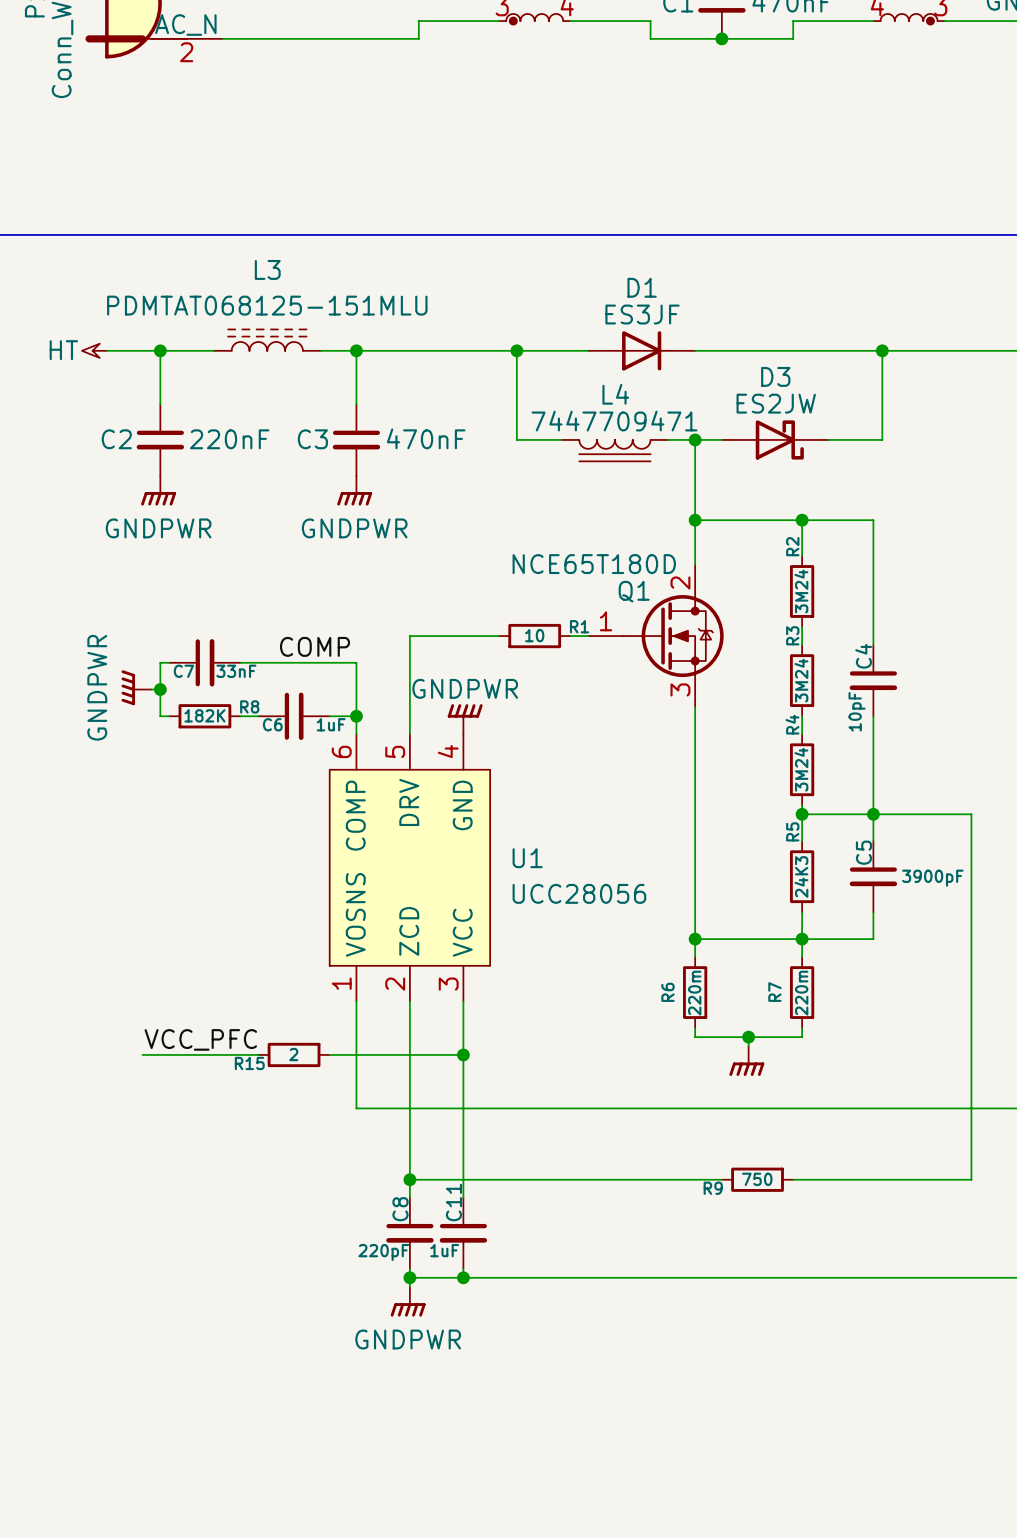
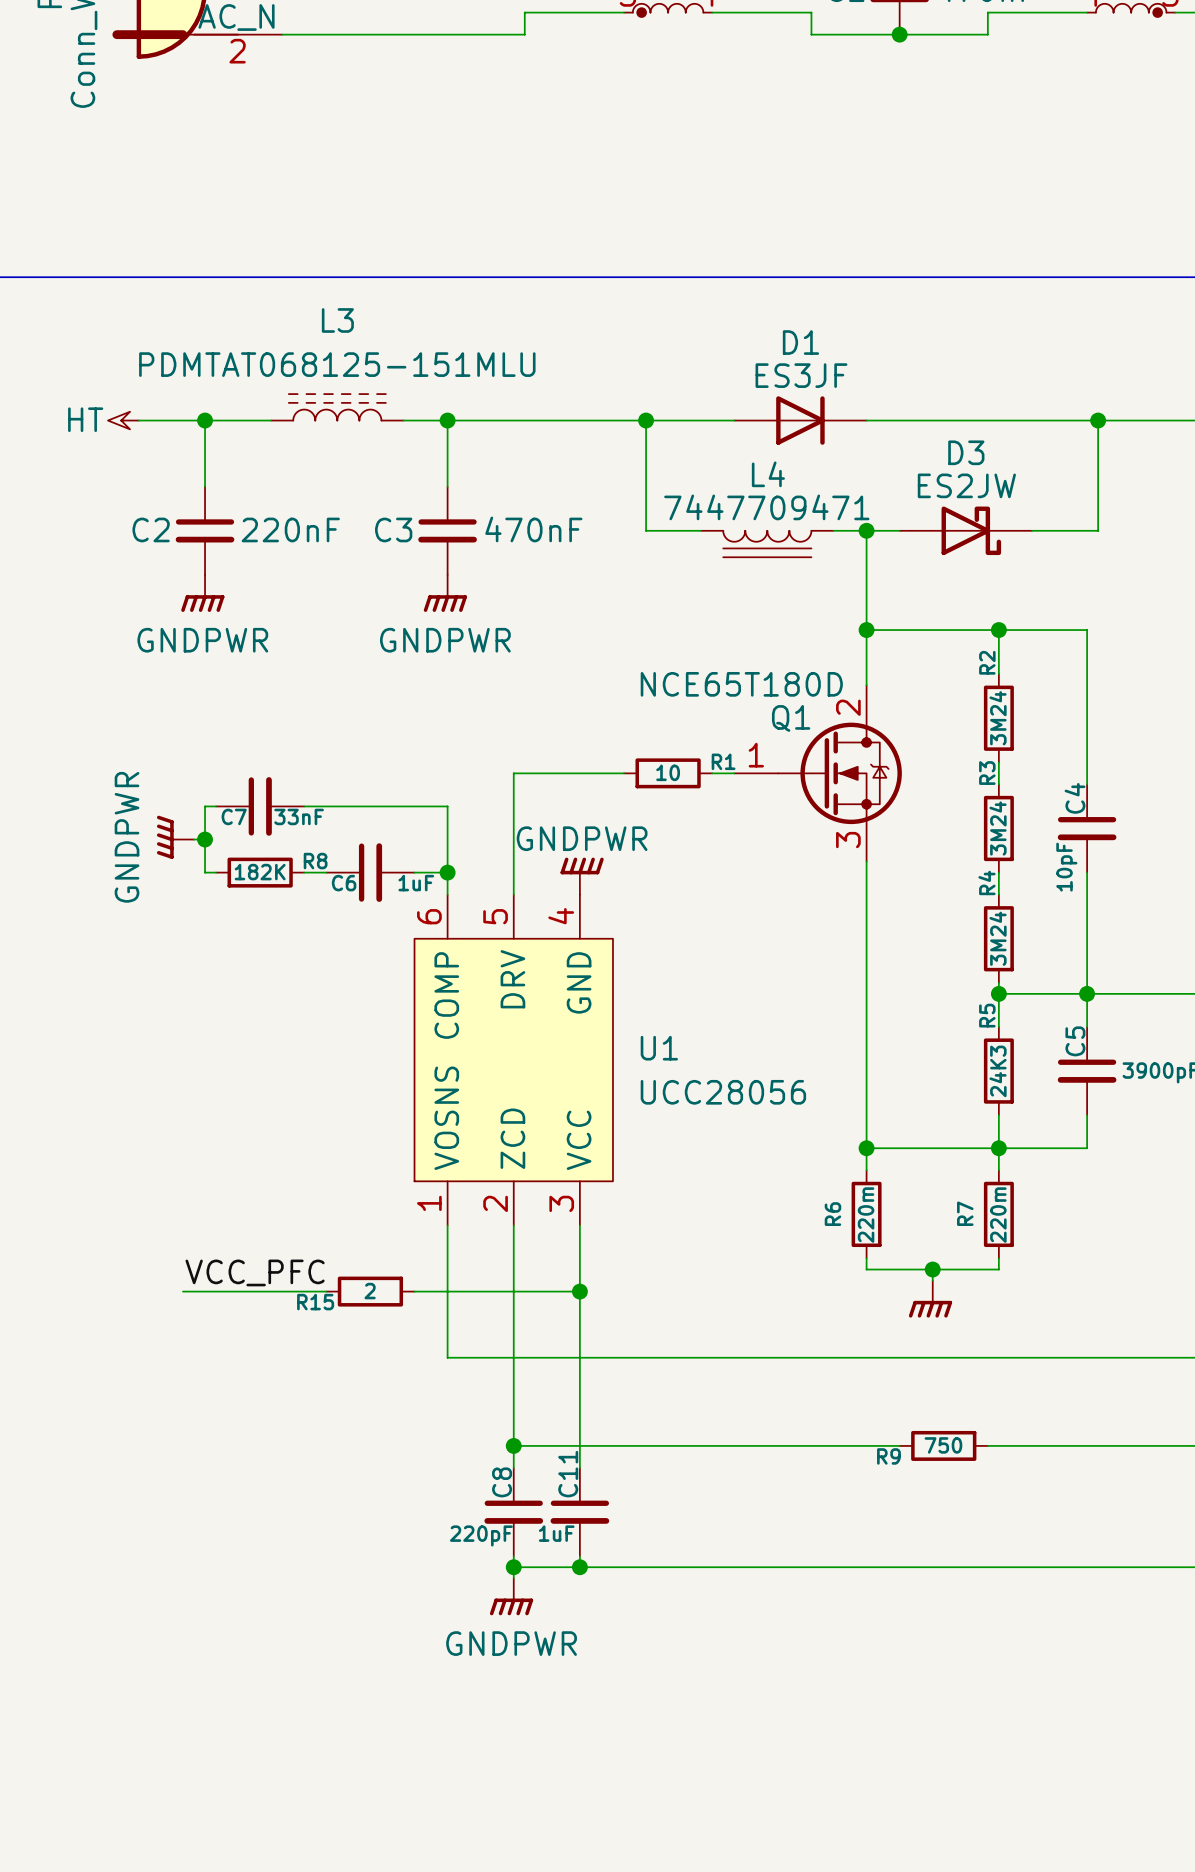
label: COMP (314, 646) -> none

